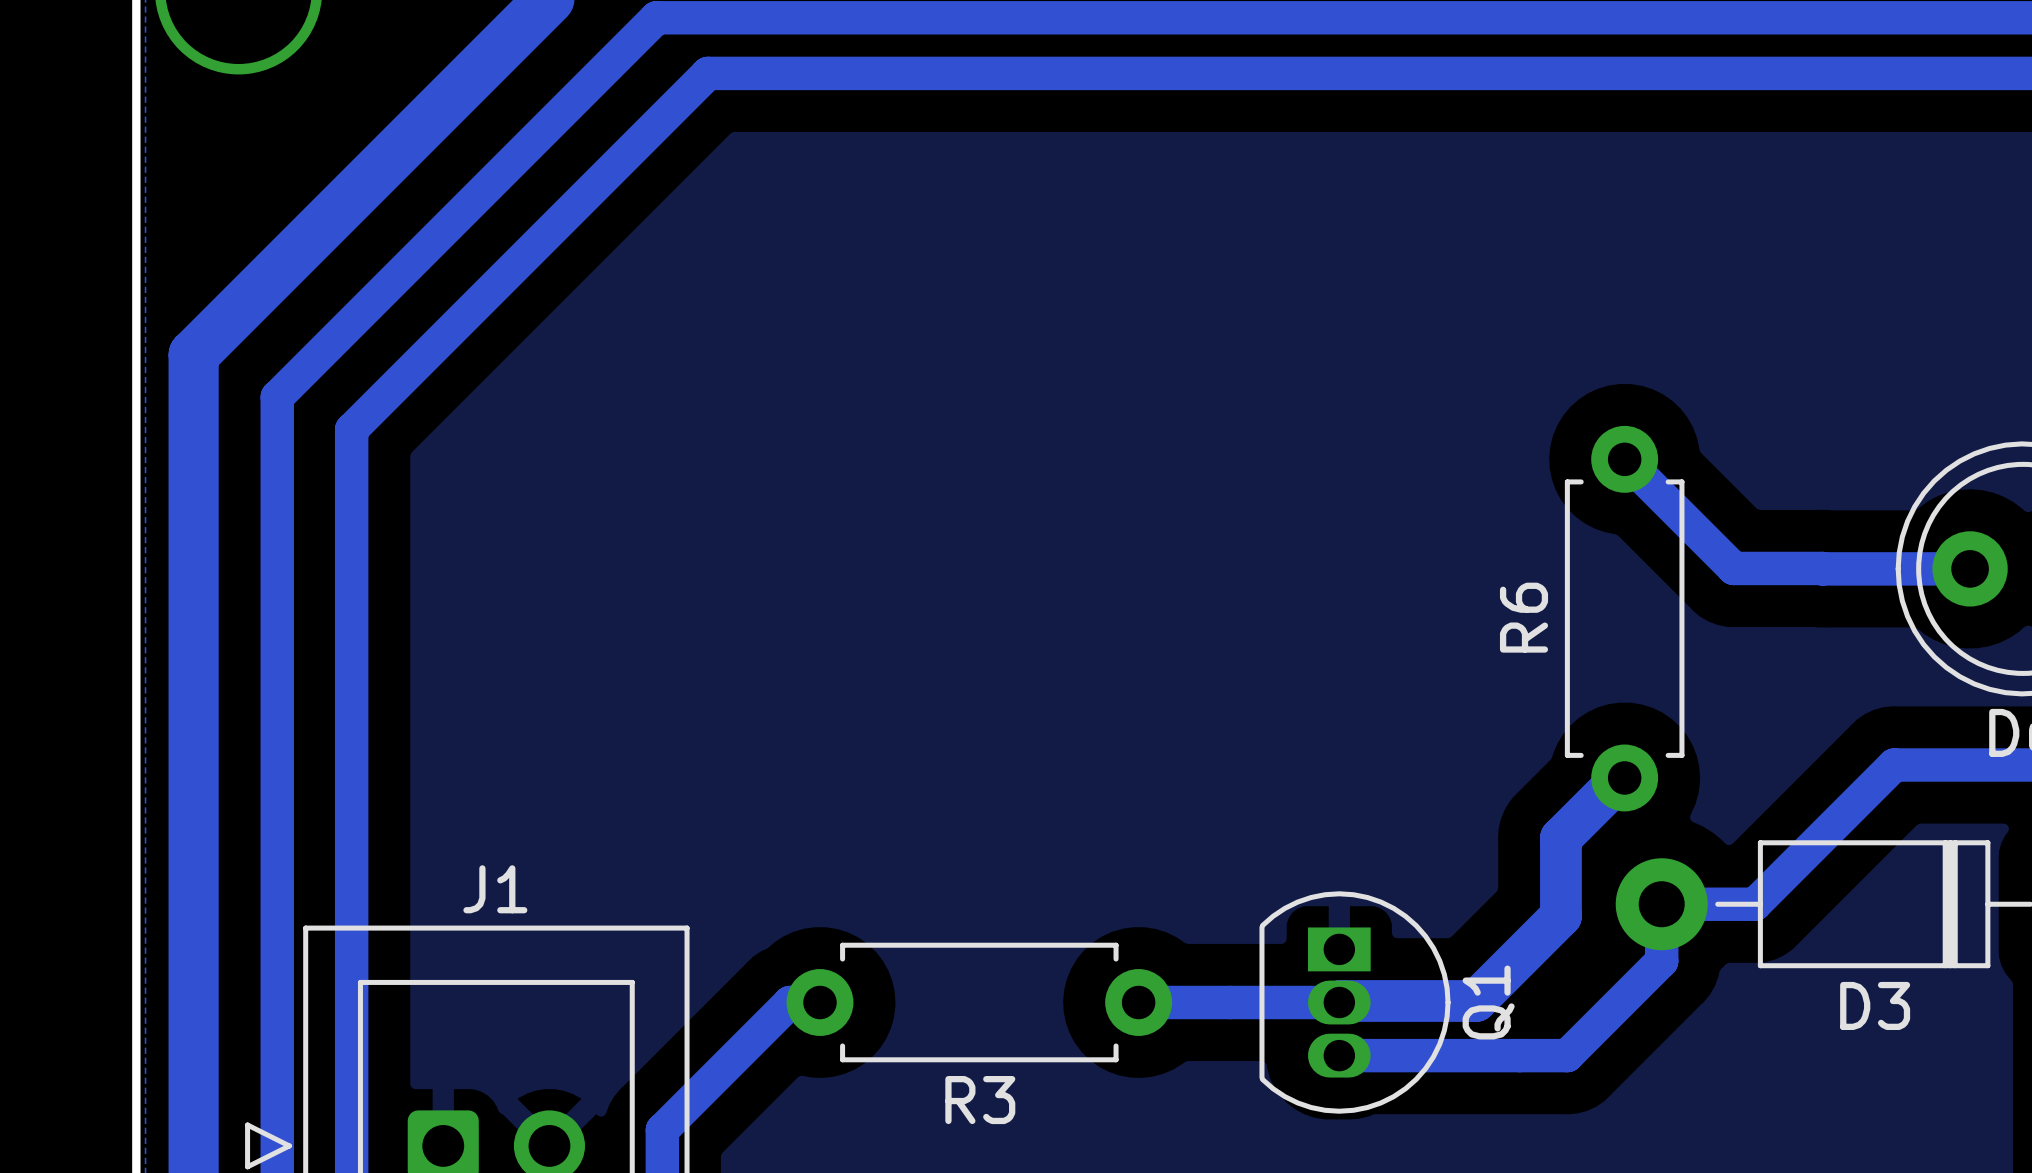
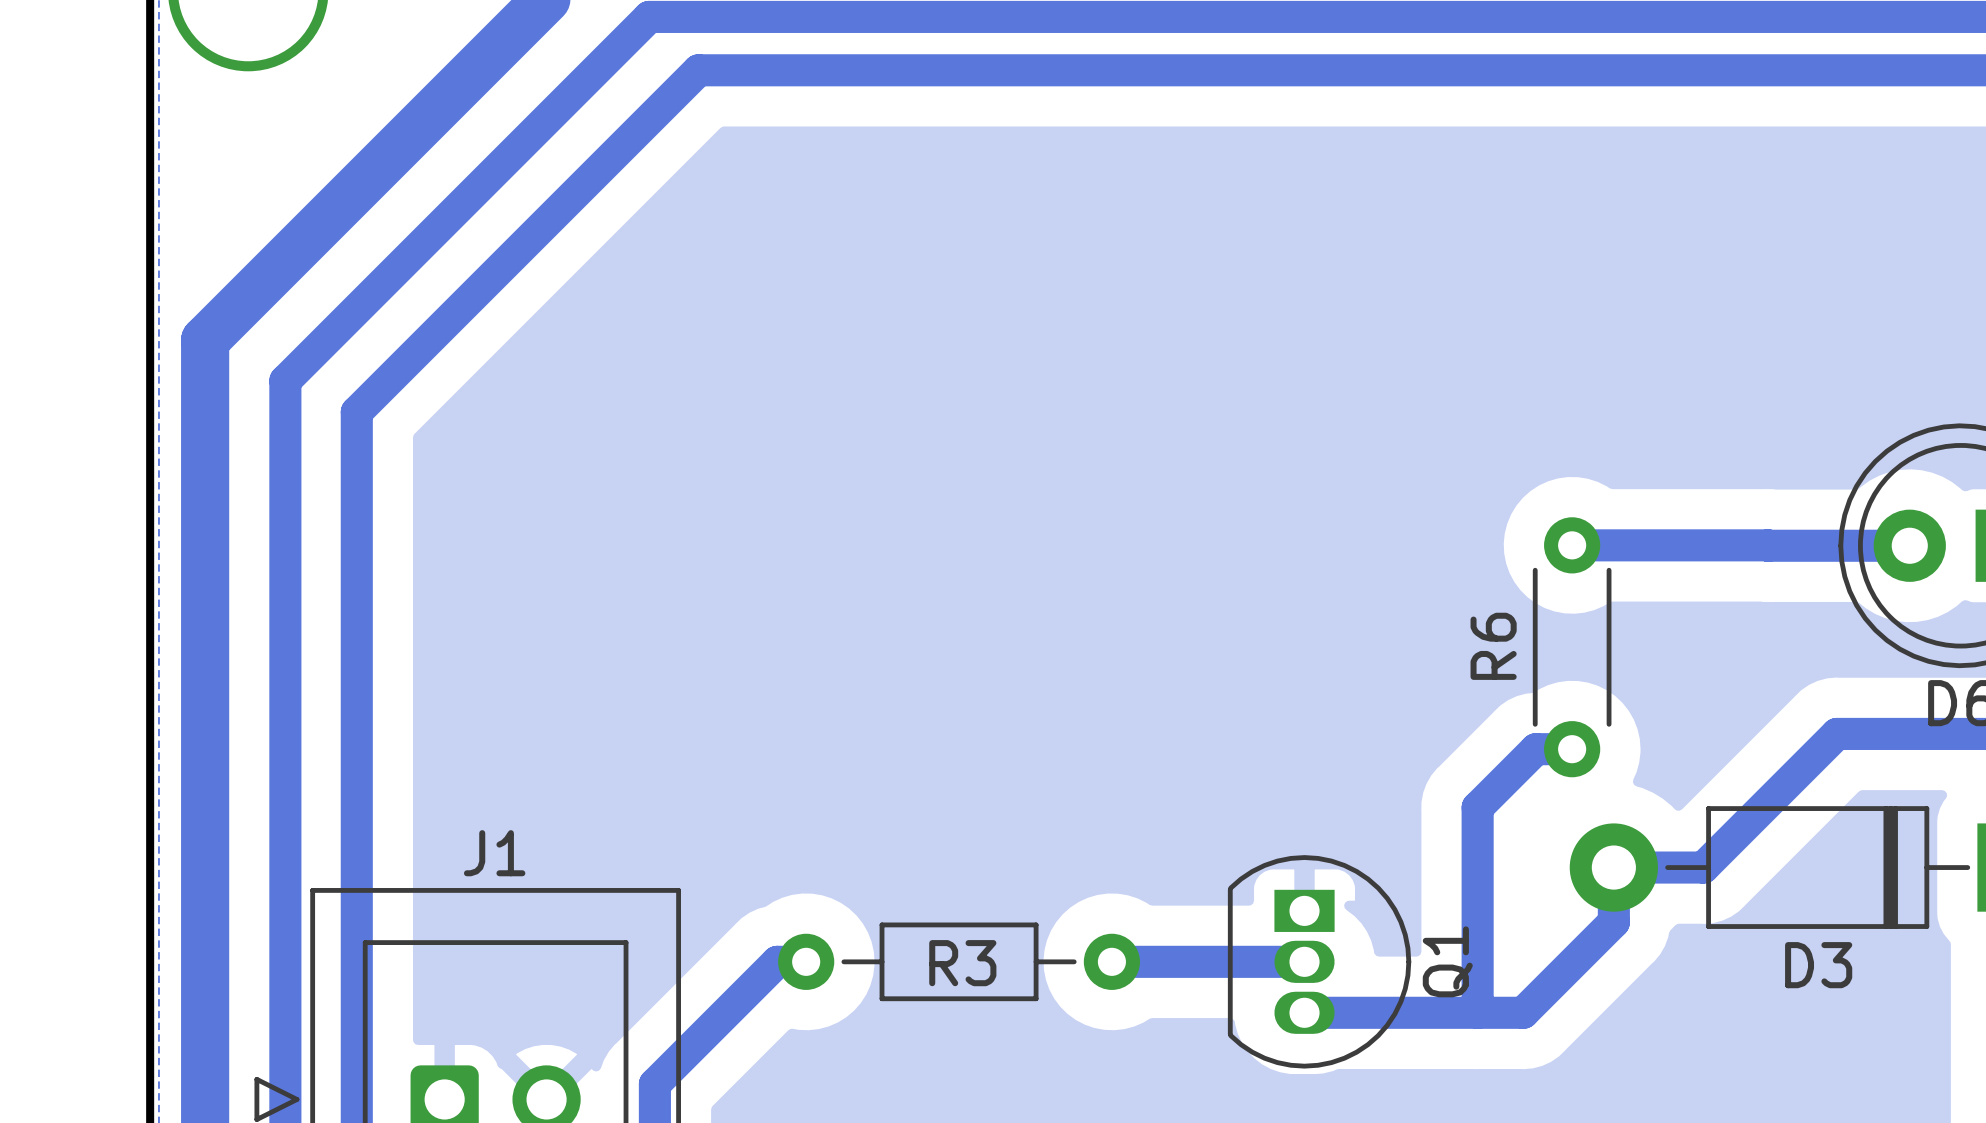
R6 footprint: [1564, 425, 1685, 812] -> [1532, 517, 1612, 778]
bottom track: (1624, 459) (1733, 568) -> (1572, 545) (1683, 545)
bottom track: (1618, 780) (1560, 838) (1560, 916) (1475, 1001) (1339, 1002) -> (1572, 749) (1536, 749) (1477, 807) (1477, 1012)
R3 footprint: [786, 942, 1173, 1063] -> [778, 922, 1141, 1002]
R3 name position: R3 (980, 1100) -> R3 (962, 963)

